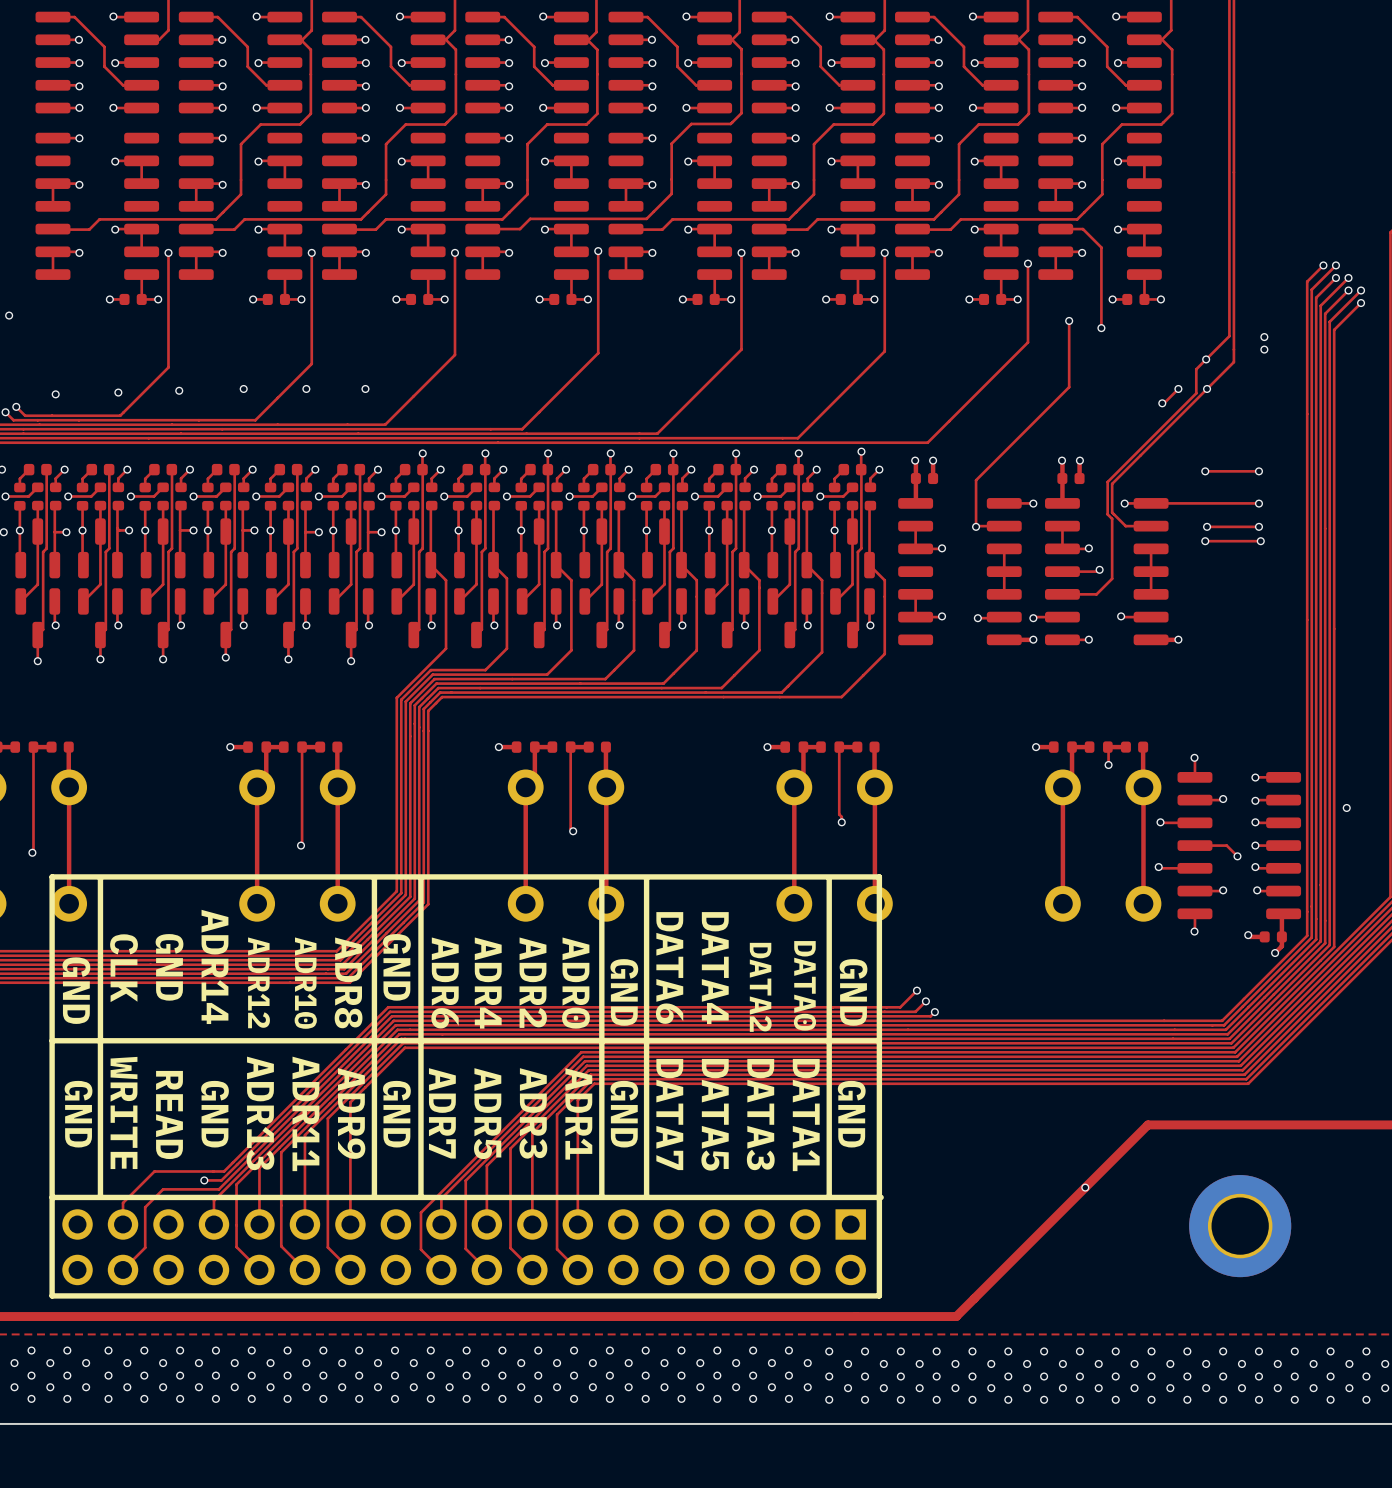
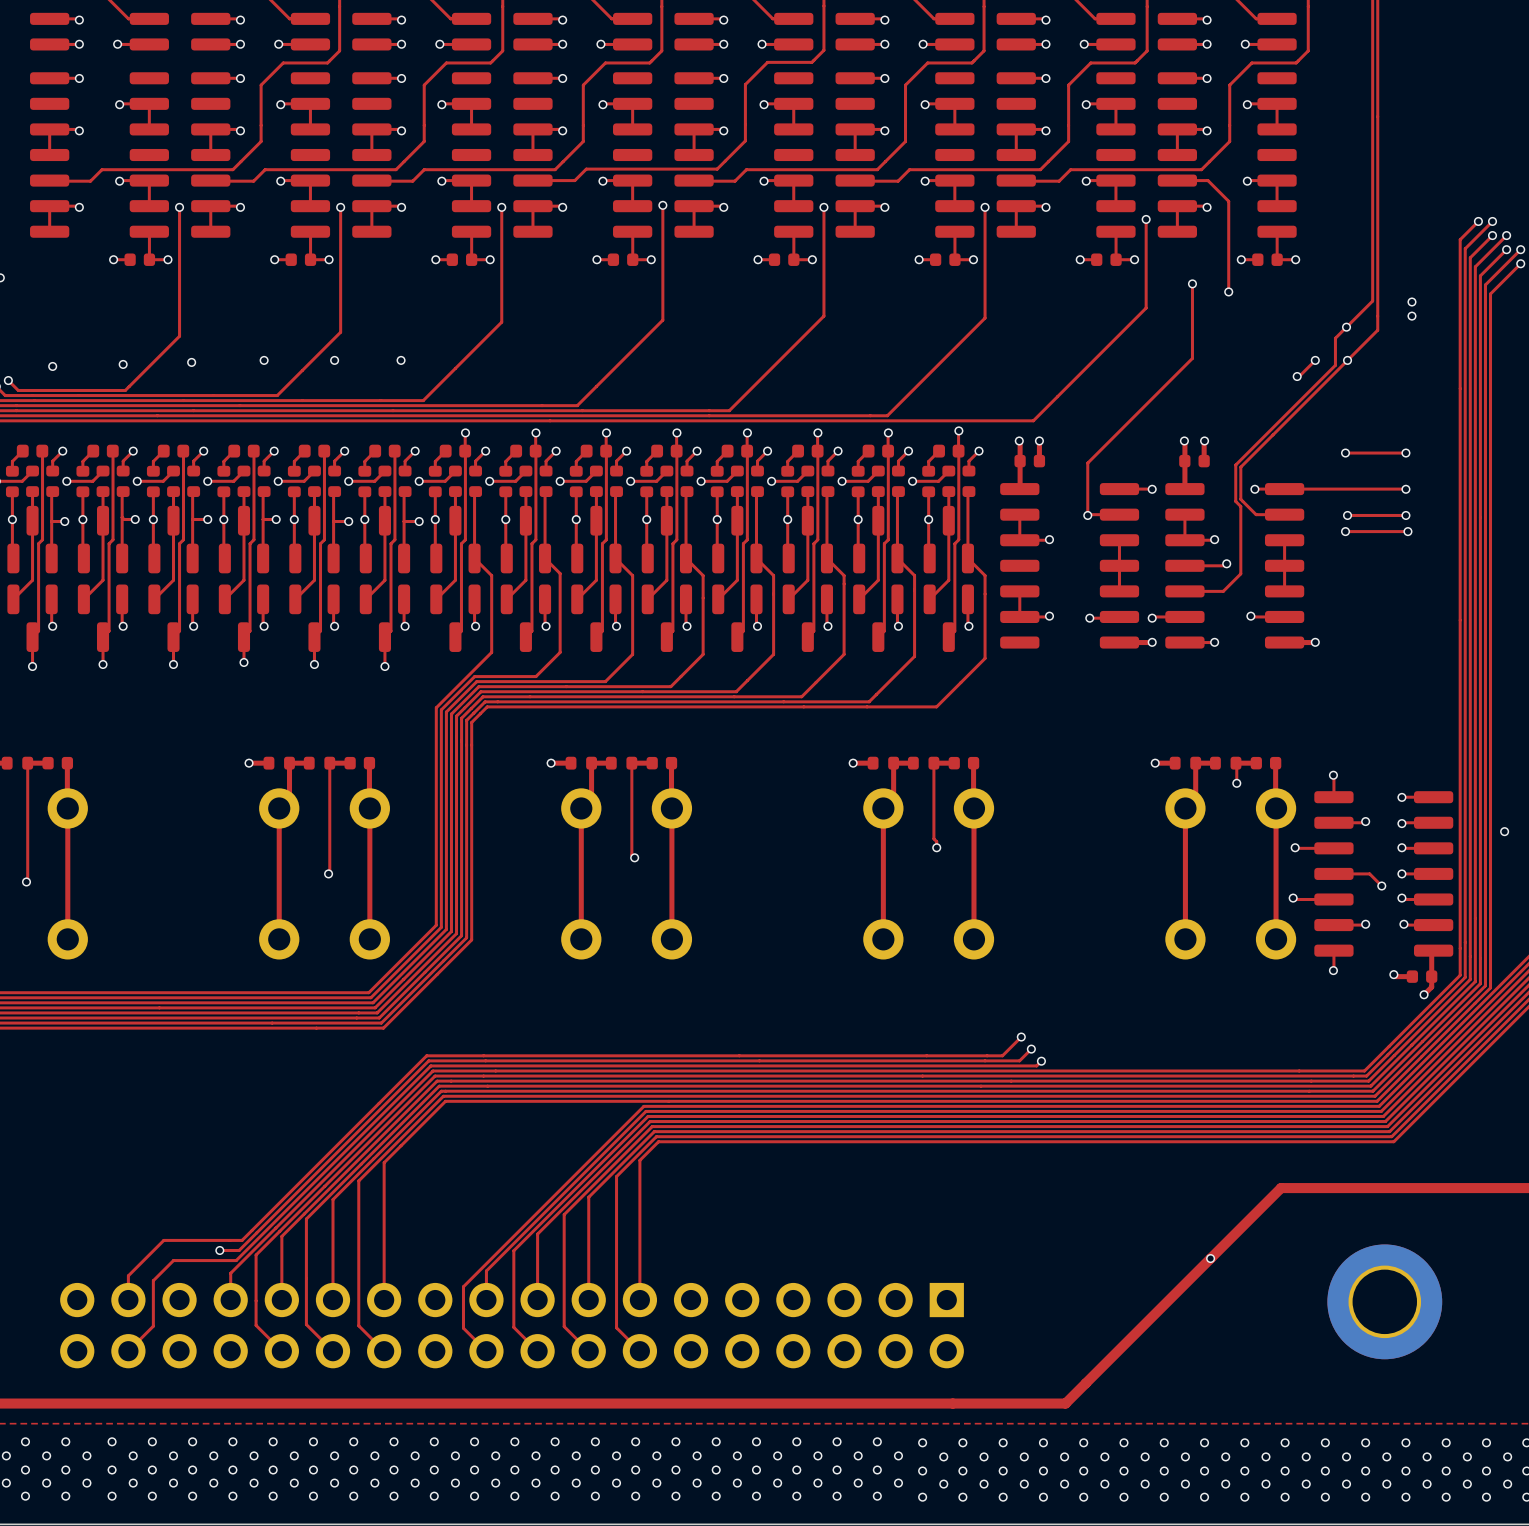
line: (879, 876) (52, 876) (52, 1295) (879, 1295) (879, 876) -> none
line: (100, 877) (100, 1196) -> none
line: (374, 877) (374, 1196) -> none
line: (420, 877) (420, 1196) -> none
line: (601, 877) (601, 1196) -> none
line: (646, 877) (646, 1196) -> none
line: (829, 877) (829, 1196) -> none
text: ADR14 (214, 966) -> none
text: GND (169, 967) -> none
text: GND (396, 967) -> none
text: DATA6 (669, 967) -> none
text: CLK (124, 968) -> none
text: DATA4 (715, 968) -> none
text: ADR12 (259, 982) -> none
text: ADR8 (348, 982) -> none
text: ADR6 (445, 982) -> none
text: ADR2 (533, 982) -> none
text: ADR10 (305, 983) -> none
text: ADR4 (488, 983) -> none
text: ADR0 (575, 983) -> none
text: DATA0 (804, 985) -> none
text: DATA2 (760, 987) -> none
text: GND (76, 990) -> none
text: GND (624, 992) -> none
text: GND (853, 992) -> none
line: (879, 1040) (52, 1040) -> none
text: WRITE (124, 1112) -> none
text: ADR13 (260, 1113) -> none
text: ADR11 (305, 1113) -> none
text: ADR9 (351, 1113) -> none
text: ADR7 (442, 1113) -> none
text: ADR5 (487, 1113) -> none
text: ADR3 (533, 1113) -> none
text: ADR1 (578, 1113) -> none
text: GND (78, 1114) -> none
text: READ (169, 1114) -> none
text: GND (214, 1114) -> none
text: GND (396, 1114) -> none
text: GND (624, 1114) -> none
text: DATA7 (669, 1114) -> none
text: DATA5 (715, 1114) -> none
text: DATA3 (760, 1114) -> none
text: GND (851, 1114) -> none
text: DATA1 (806, 1115) -> none
line: (881, 1197) (52, 1197) -> none

